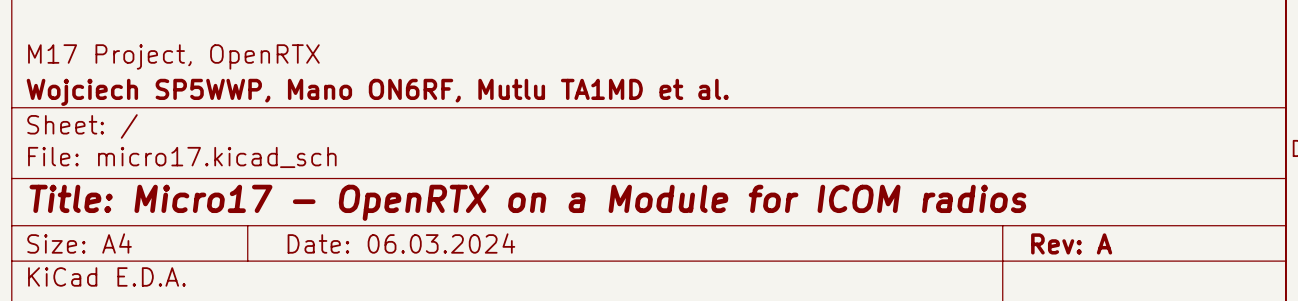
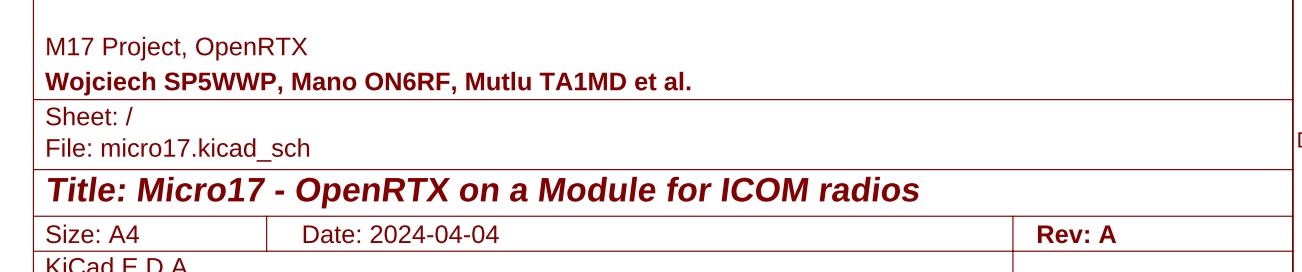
title block: Date: 06.03.2024 (401, 243) -> Date: 2024-04-04 (401, 234)

